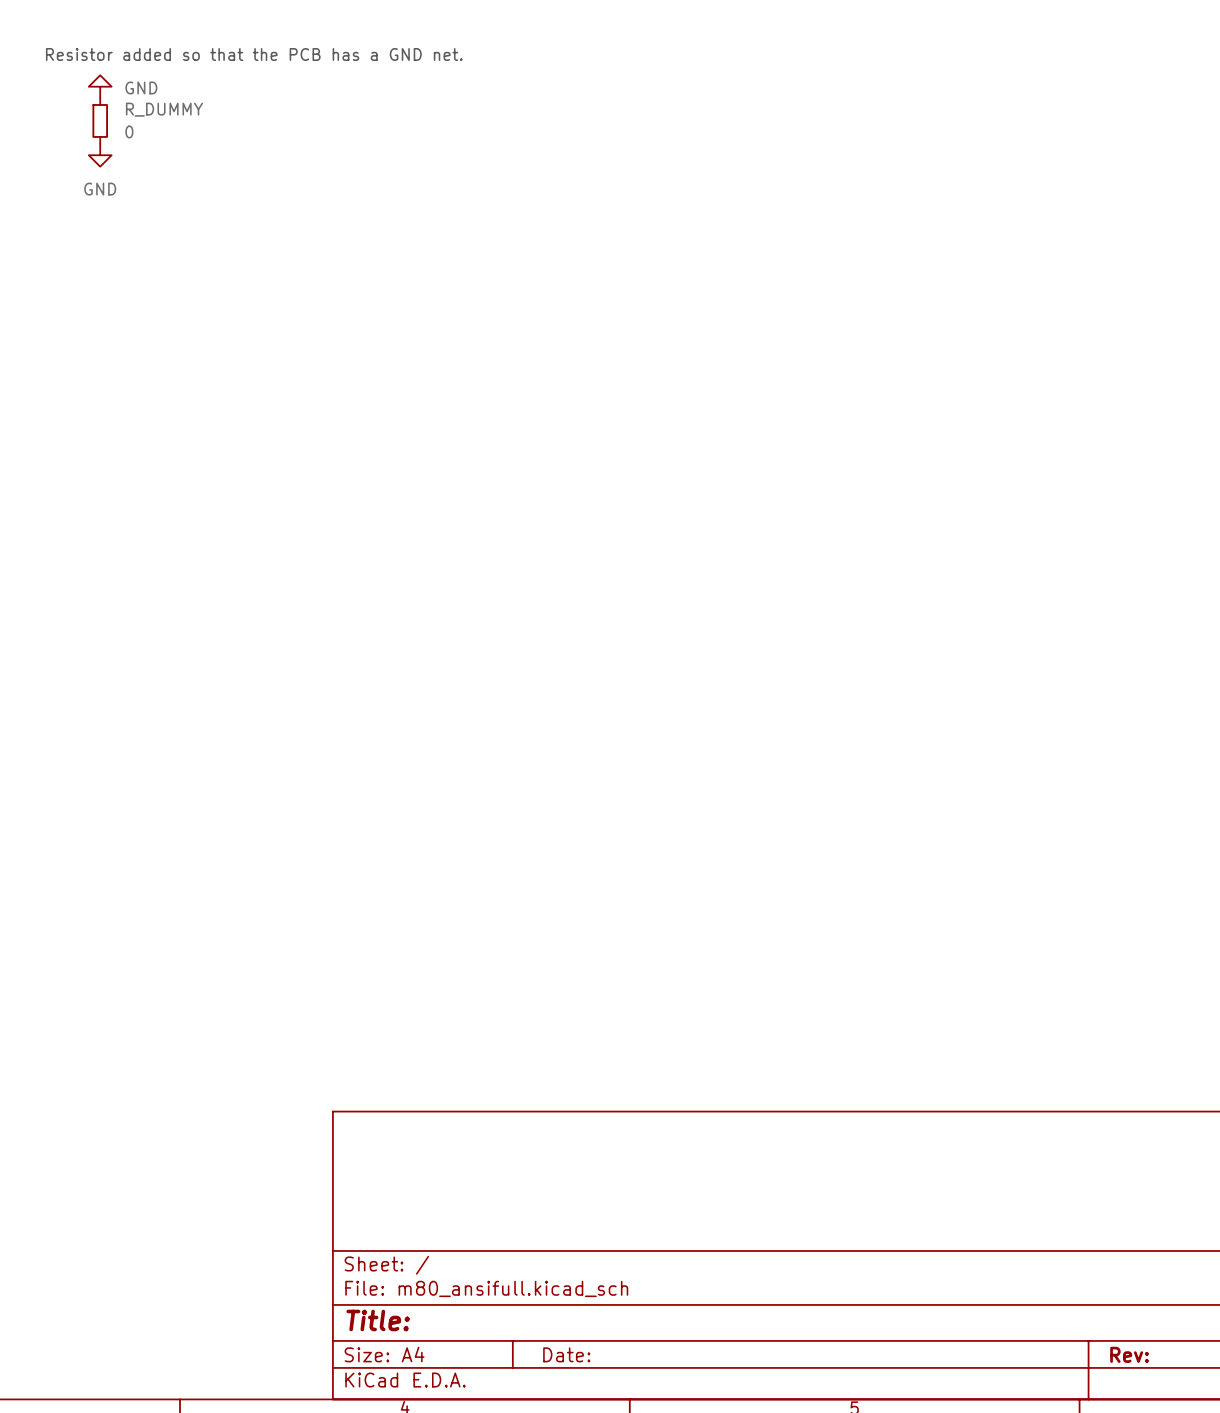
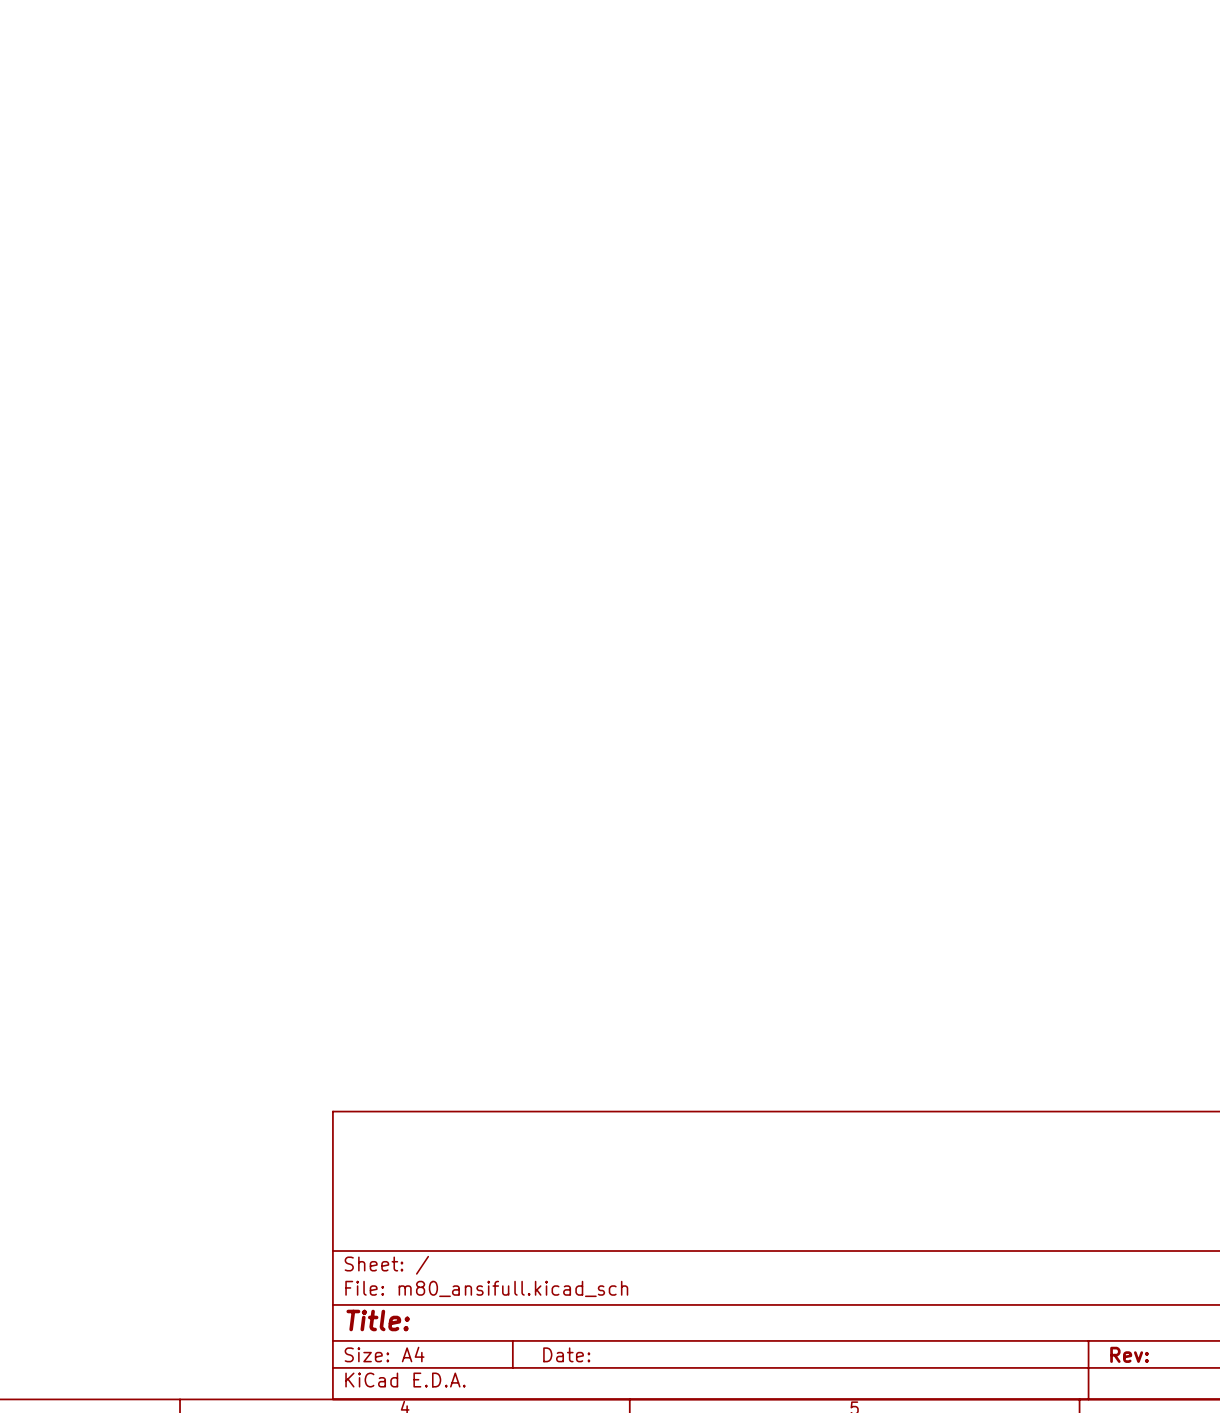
text: Resistor added so that the PCB has a GND net. (254, 54) -> none
power symbol: GND (100, 86) -> none
R_DUMMY: 0 (100, 120) -> none
power symbol: GND (100, 155) -> none

